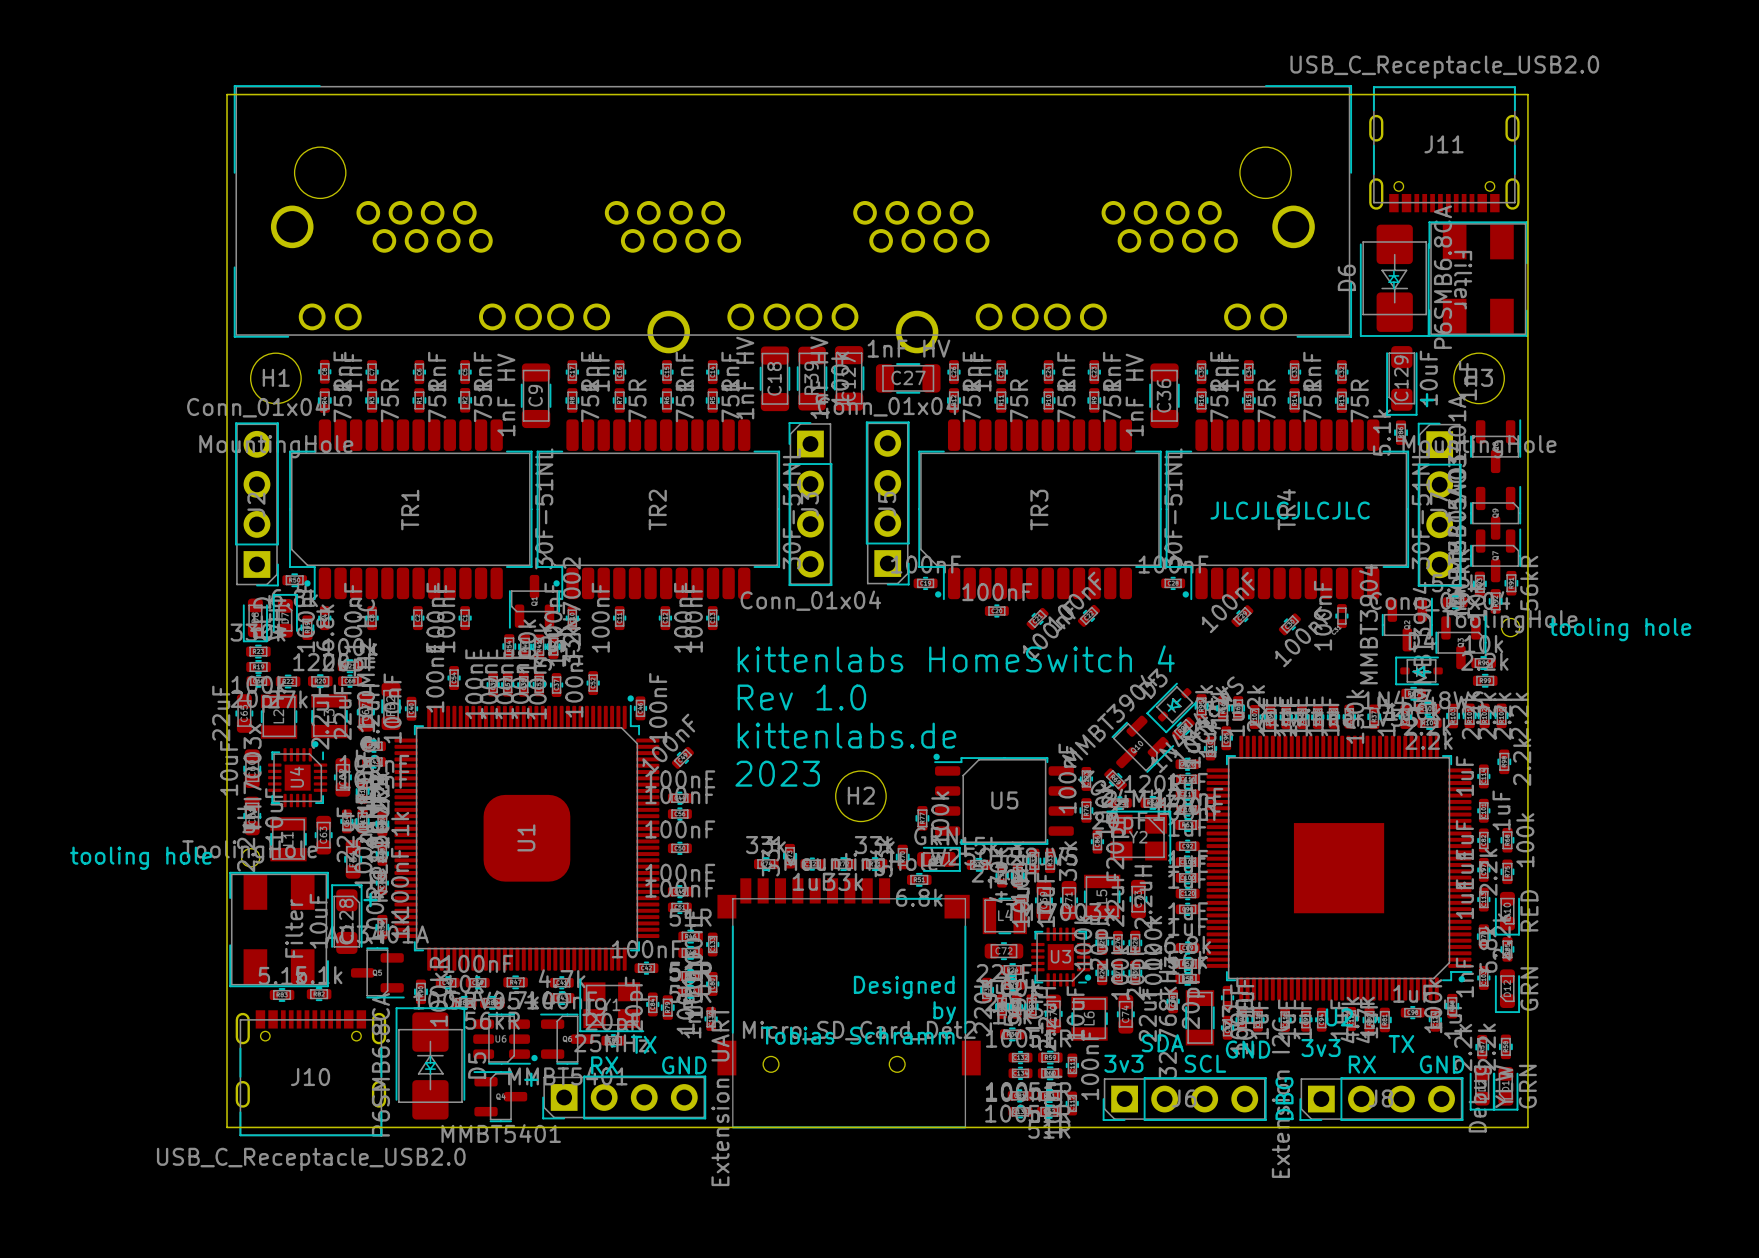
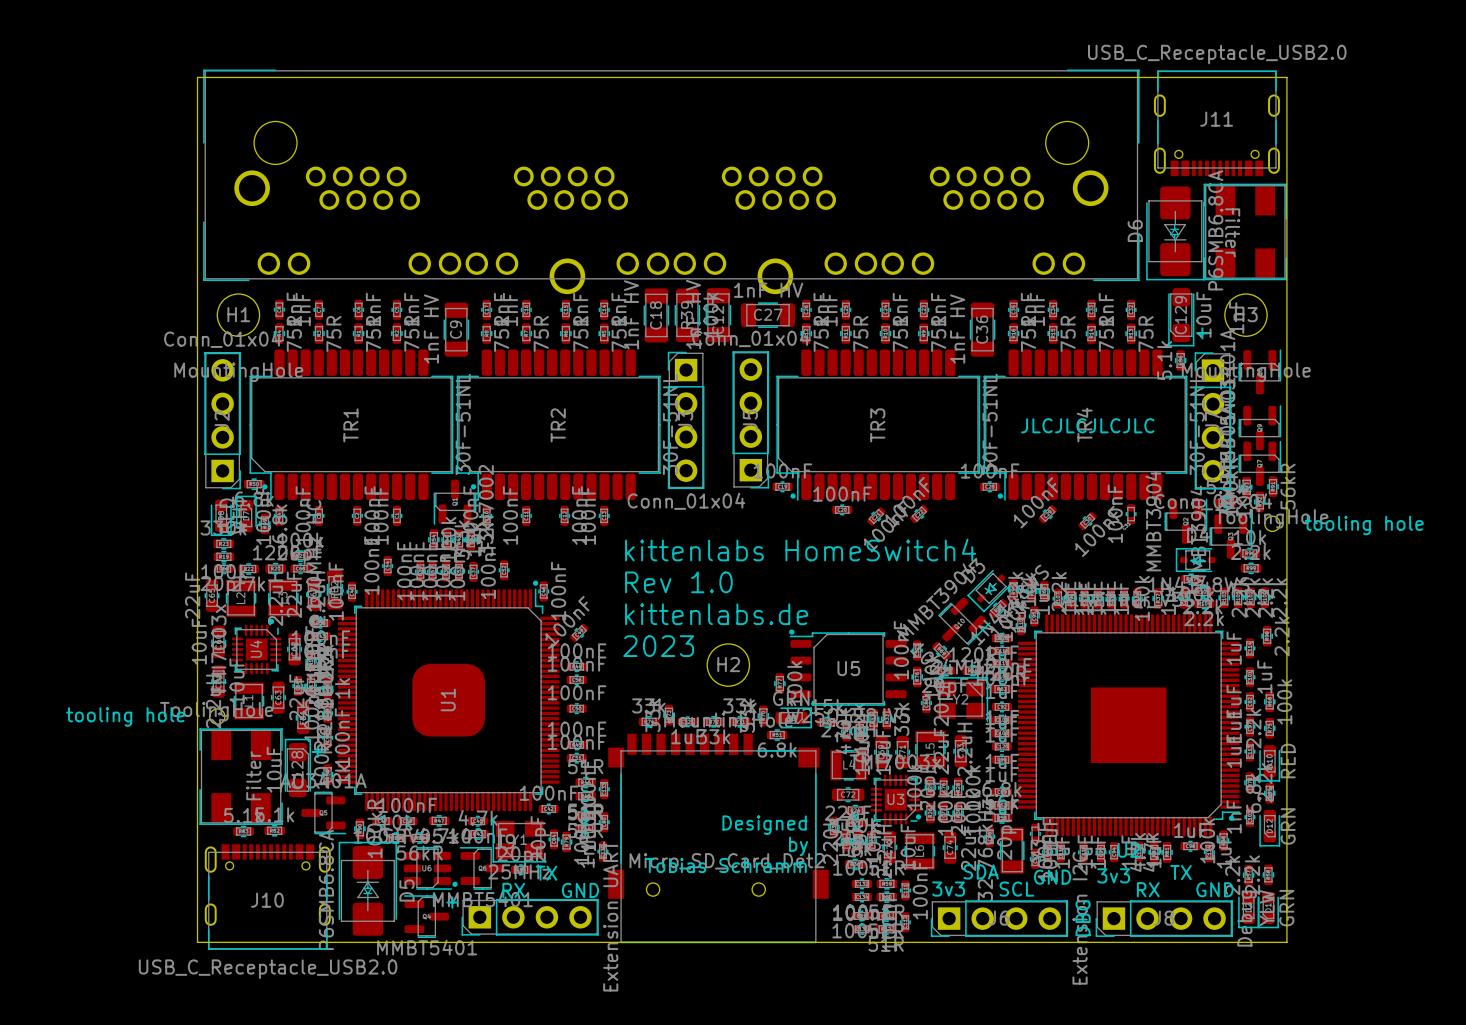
text: kittenlabs HomeSwitch 4 (956, 658) -> kittenlabs HomeSwitch4 (800, 550)

